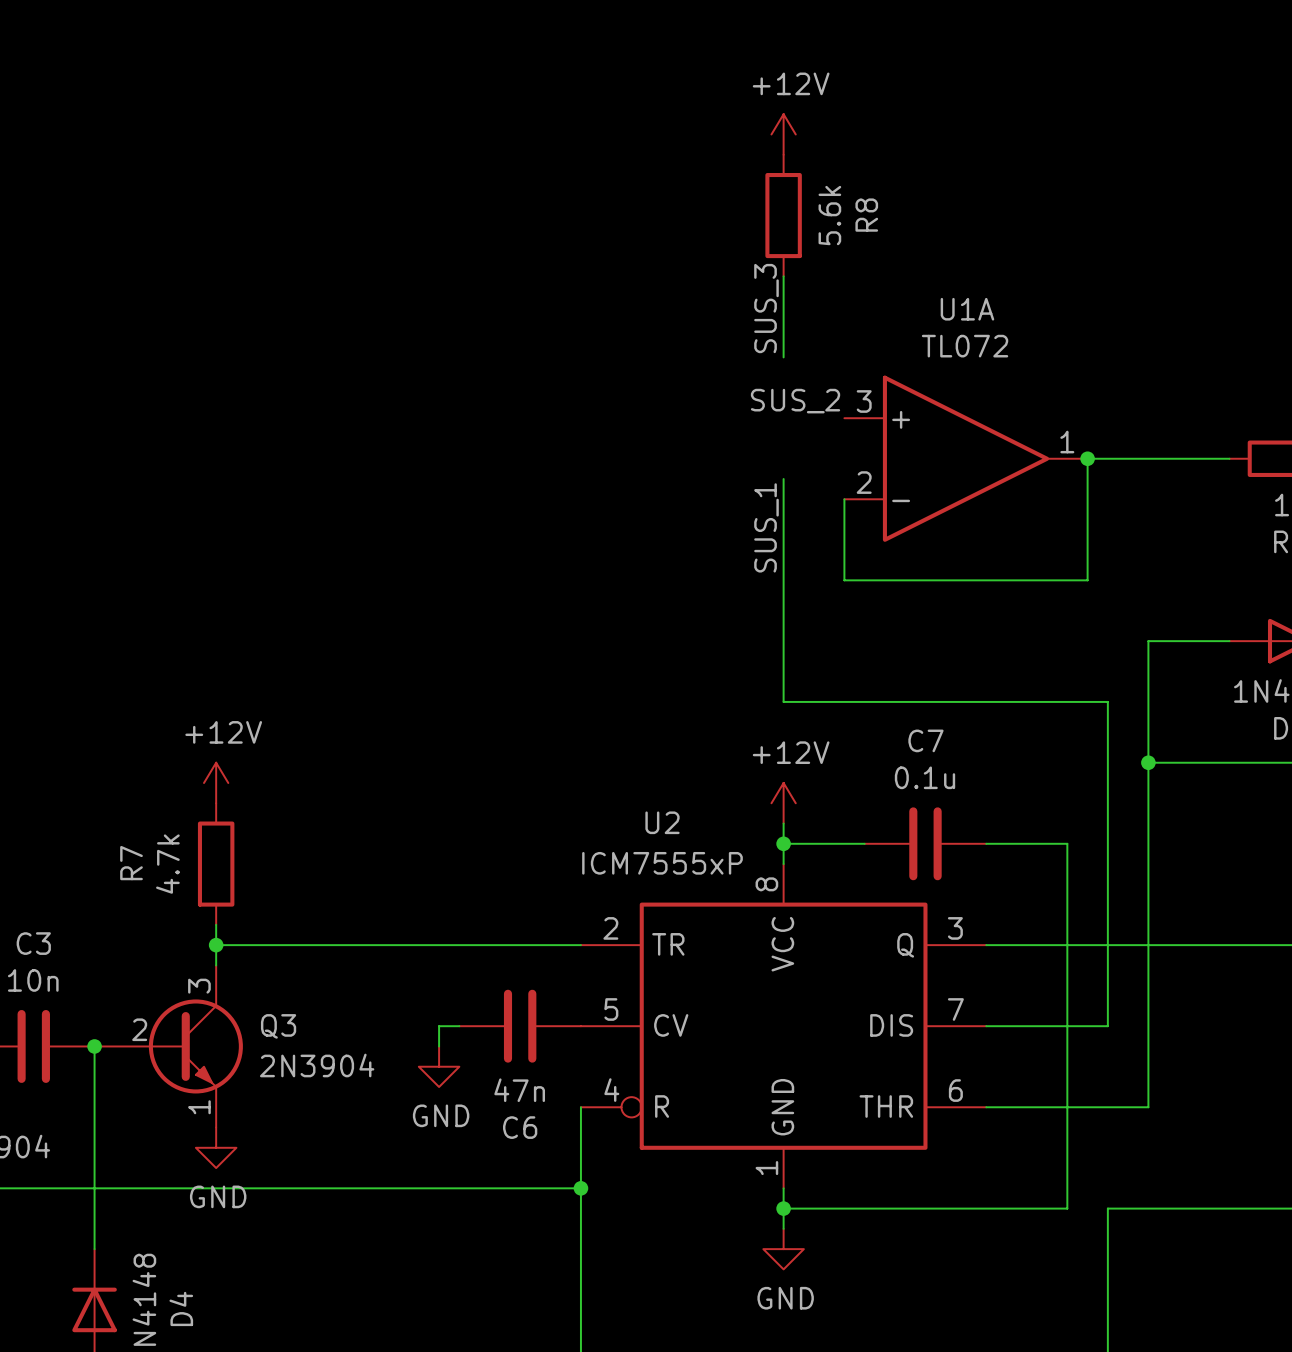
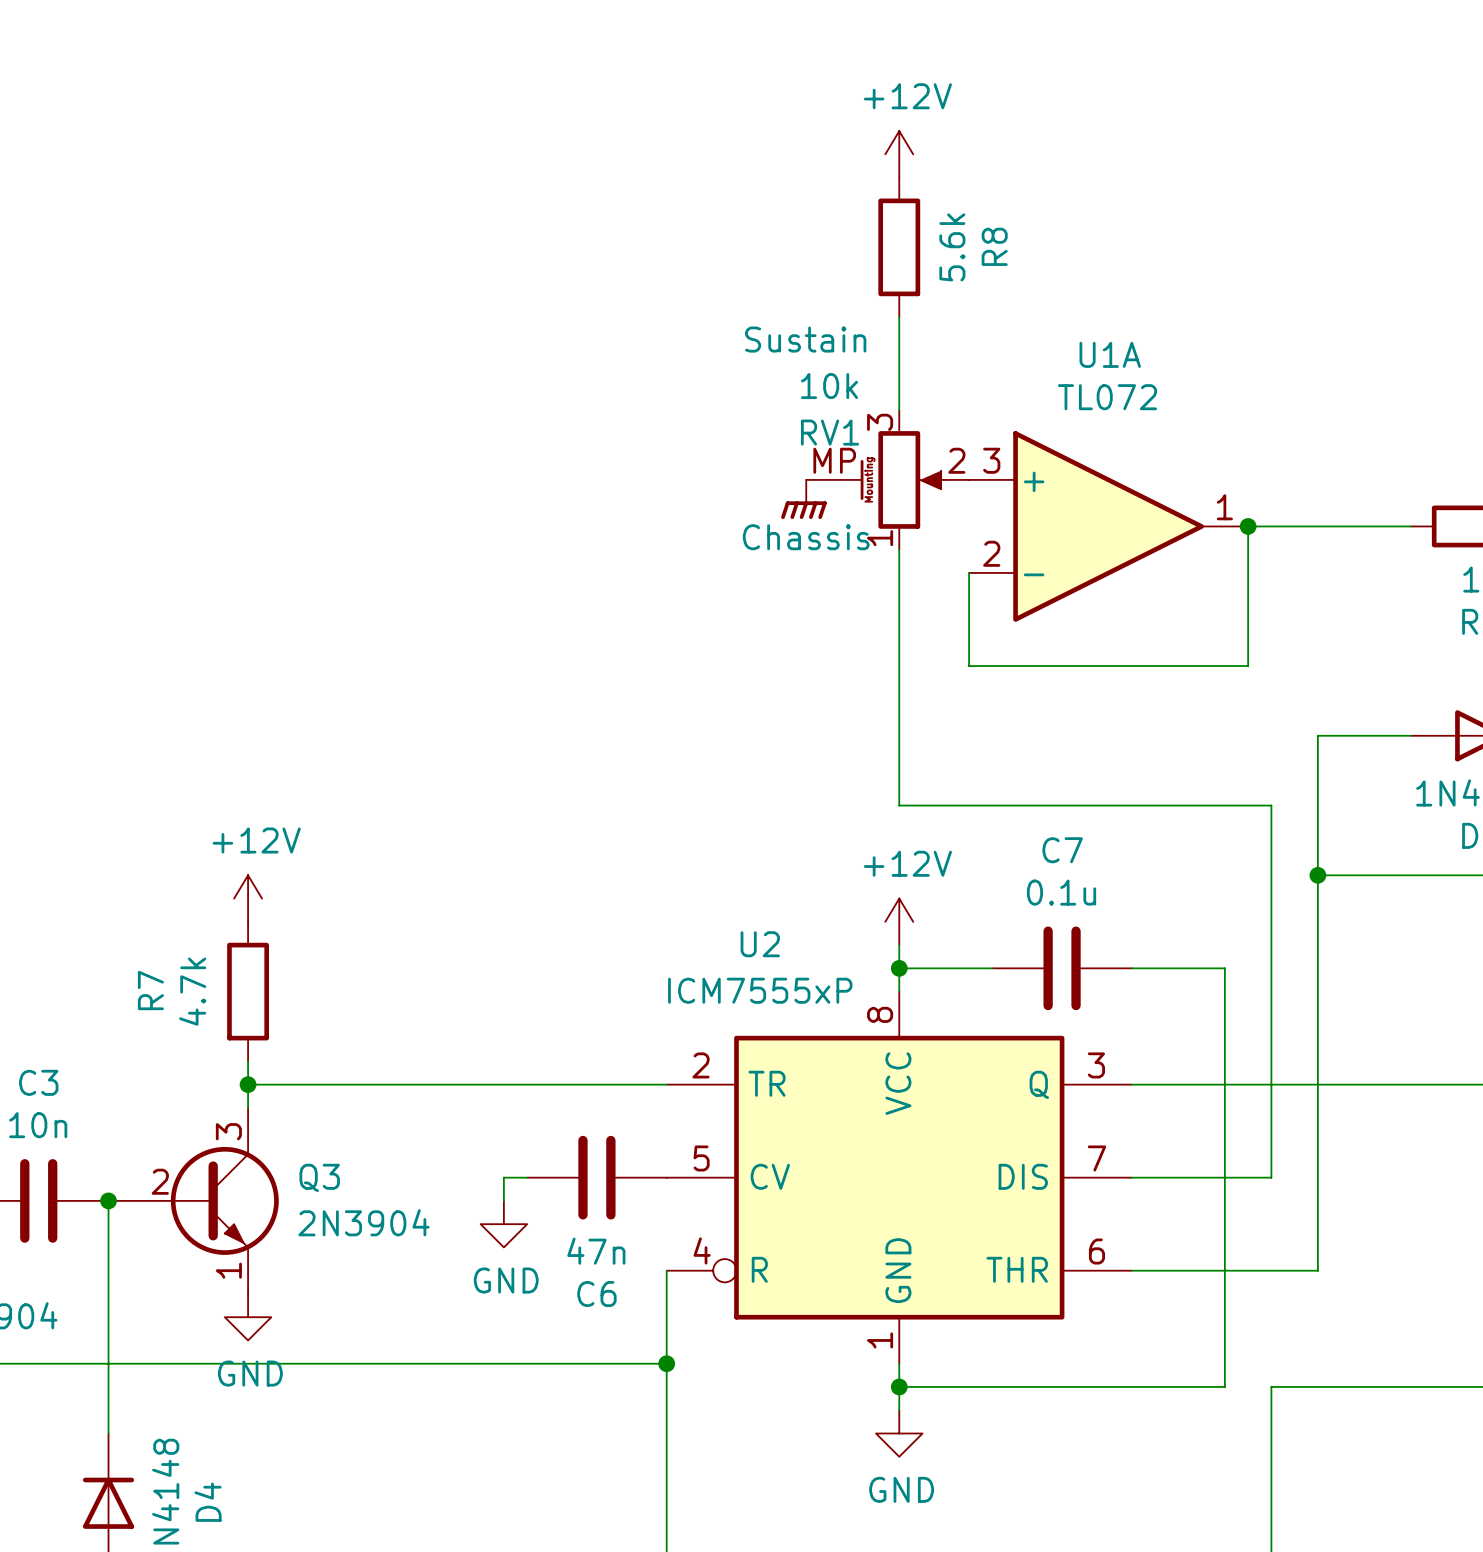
label: SUS_3 (766, 308) -> none
label: SUS_2 (795, 401) -> none
RV1: none -> 10k (887, 479)
power symbol: none -> Chassis (803, 499)
label: SUS_1 (766, 527) -> none

